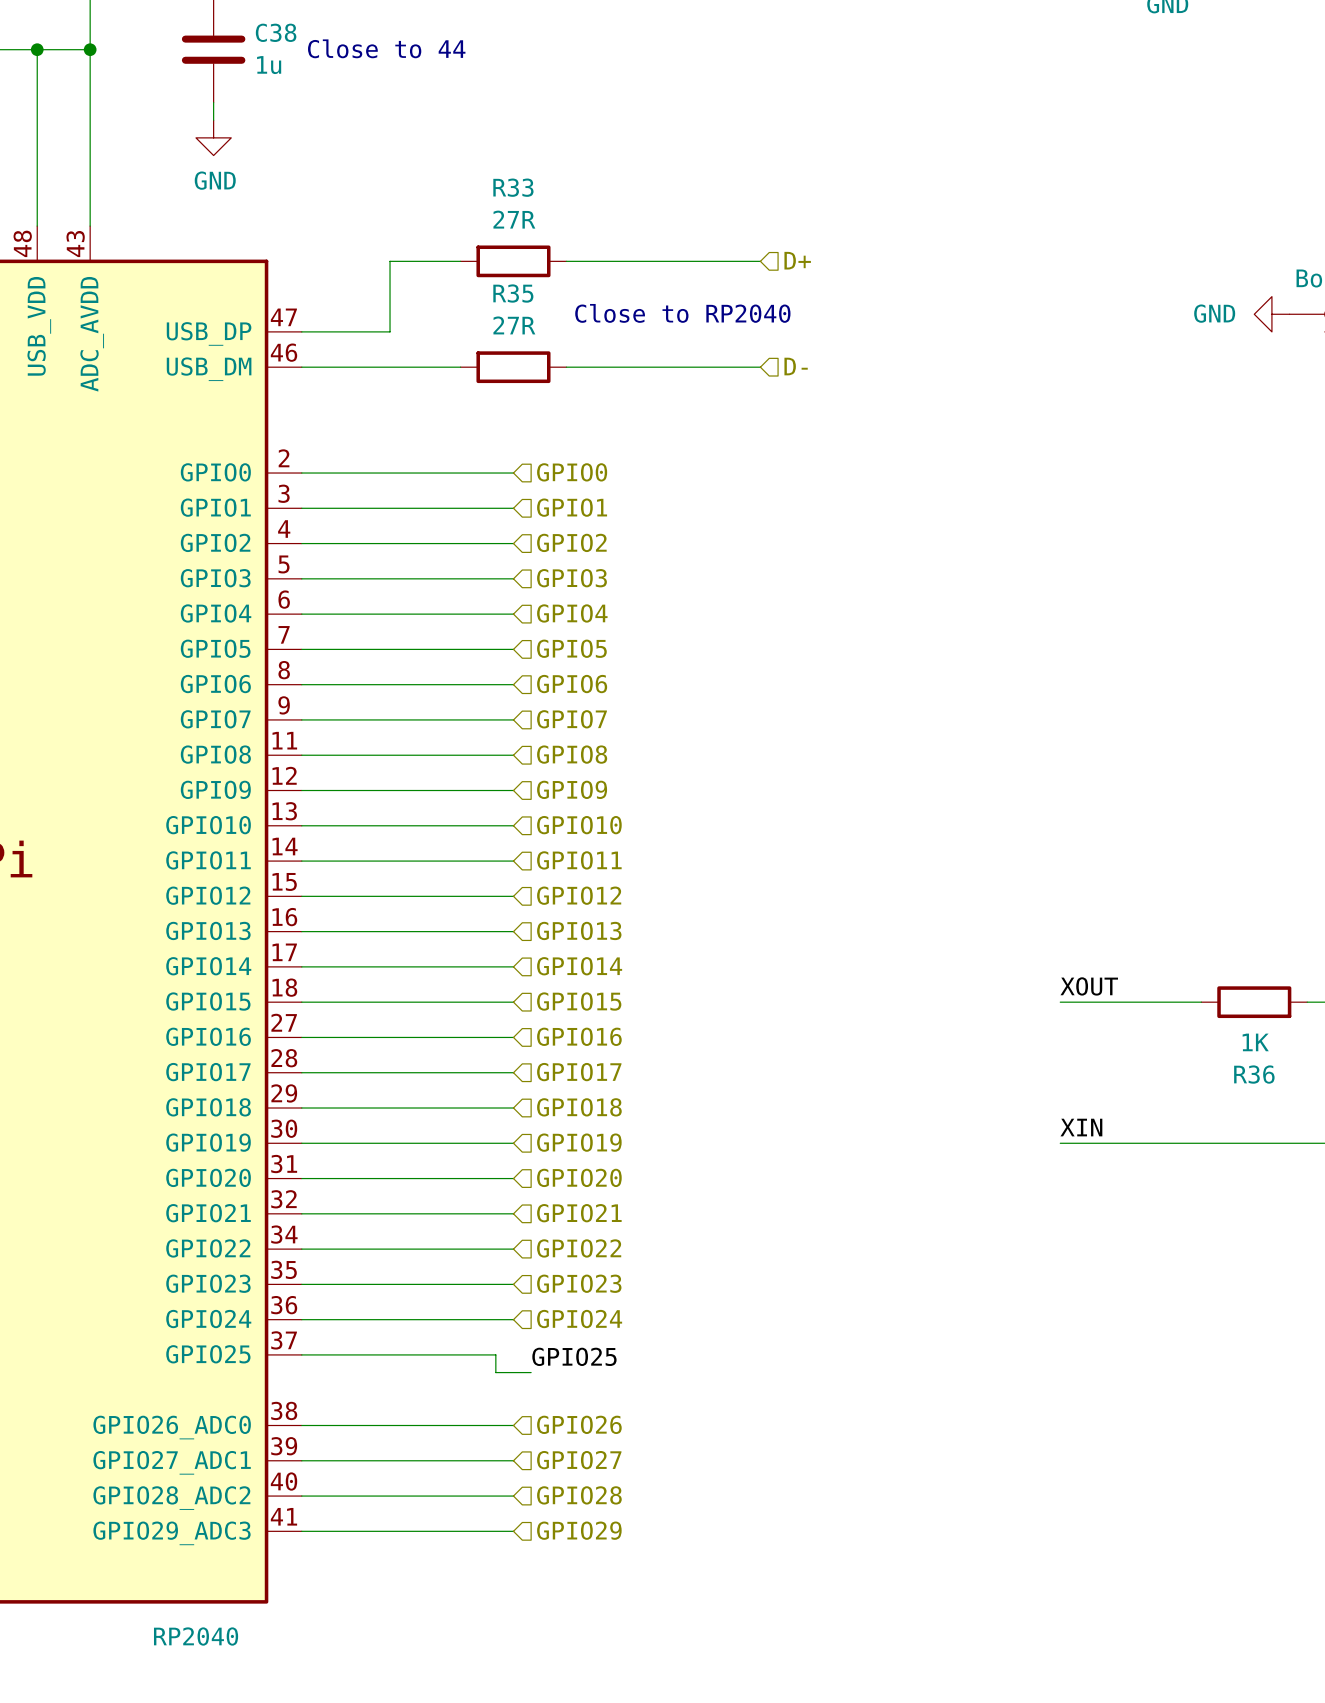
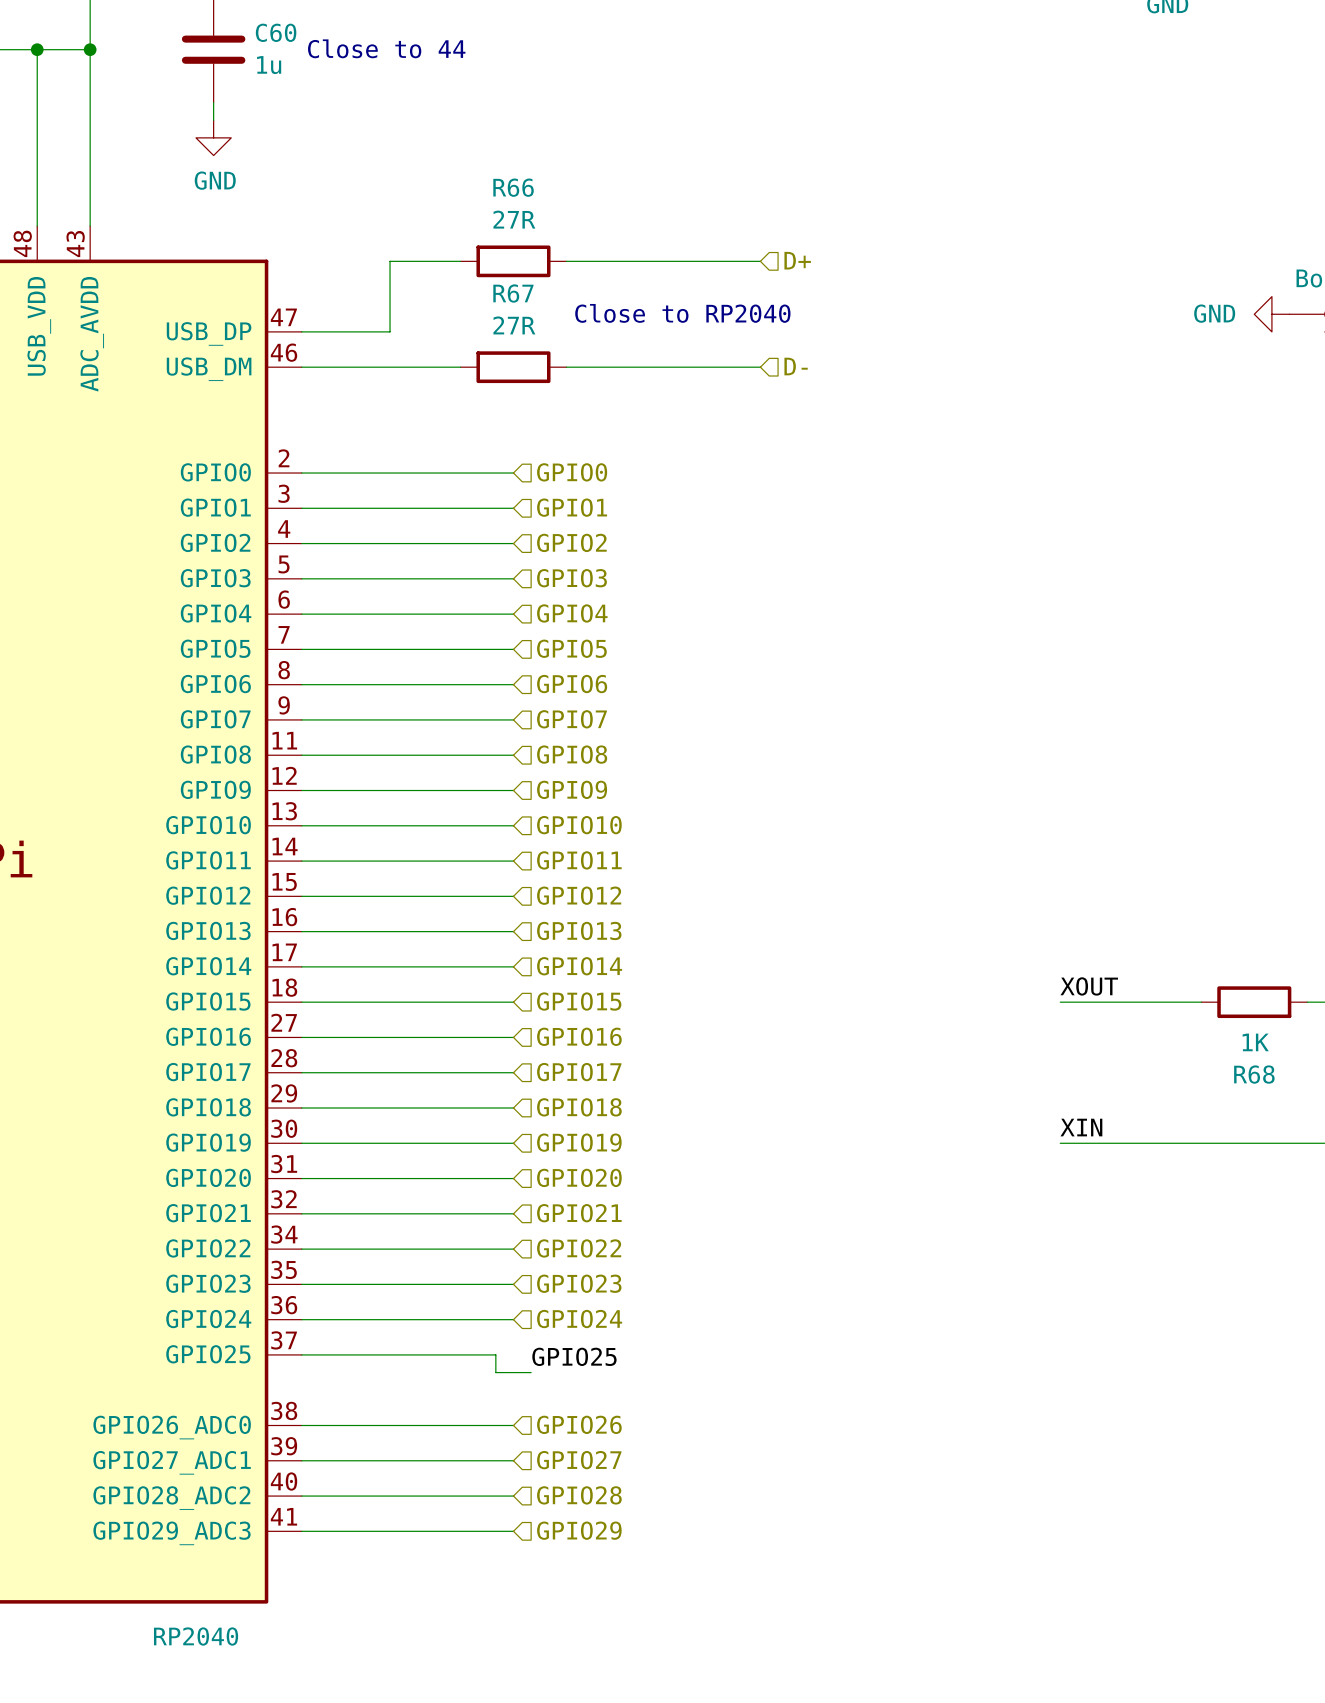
C38 name: C38 (276, 32) -> C60 (276, 32)
R33 name: R33 (513, 187) -> R66 (513, 187)
R35 name: R35 (513, 293) -> R67 (513, 293)
R36 name: R36 (1254, 1074) -> R68 (1254, 1074)

